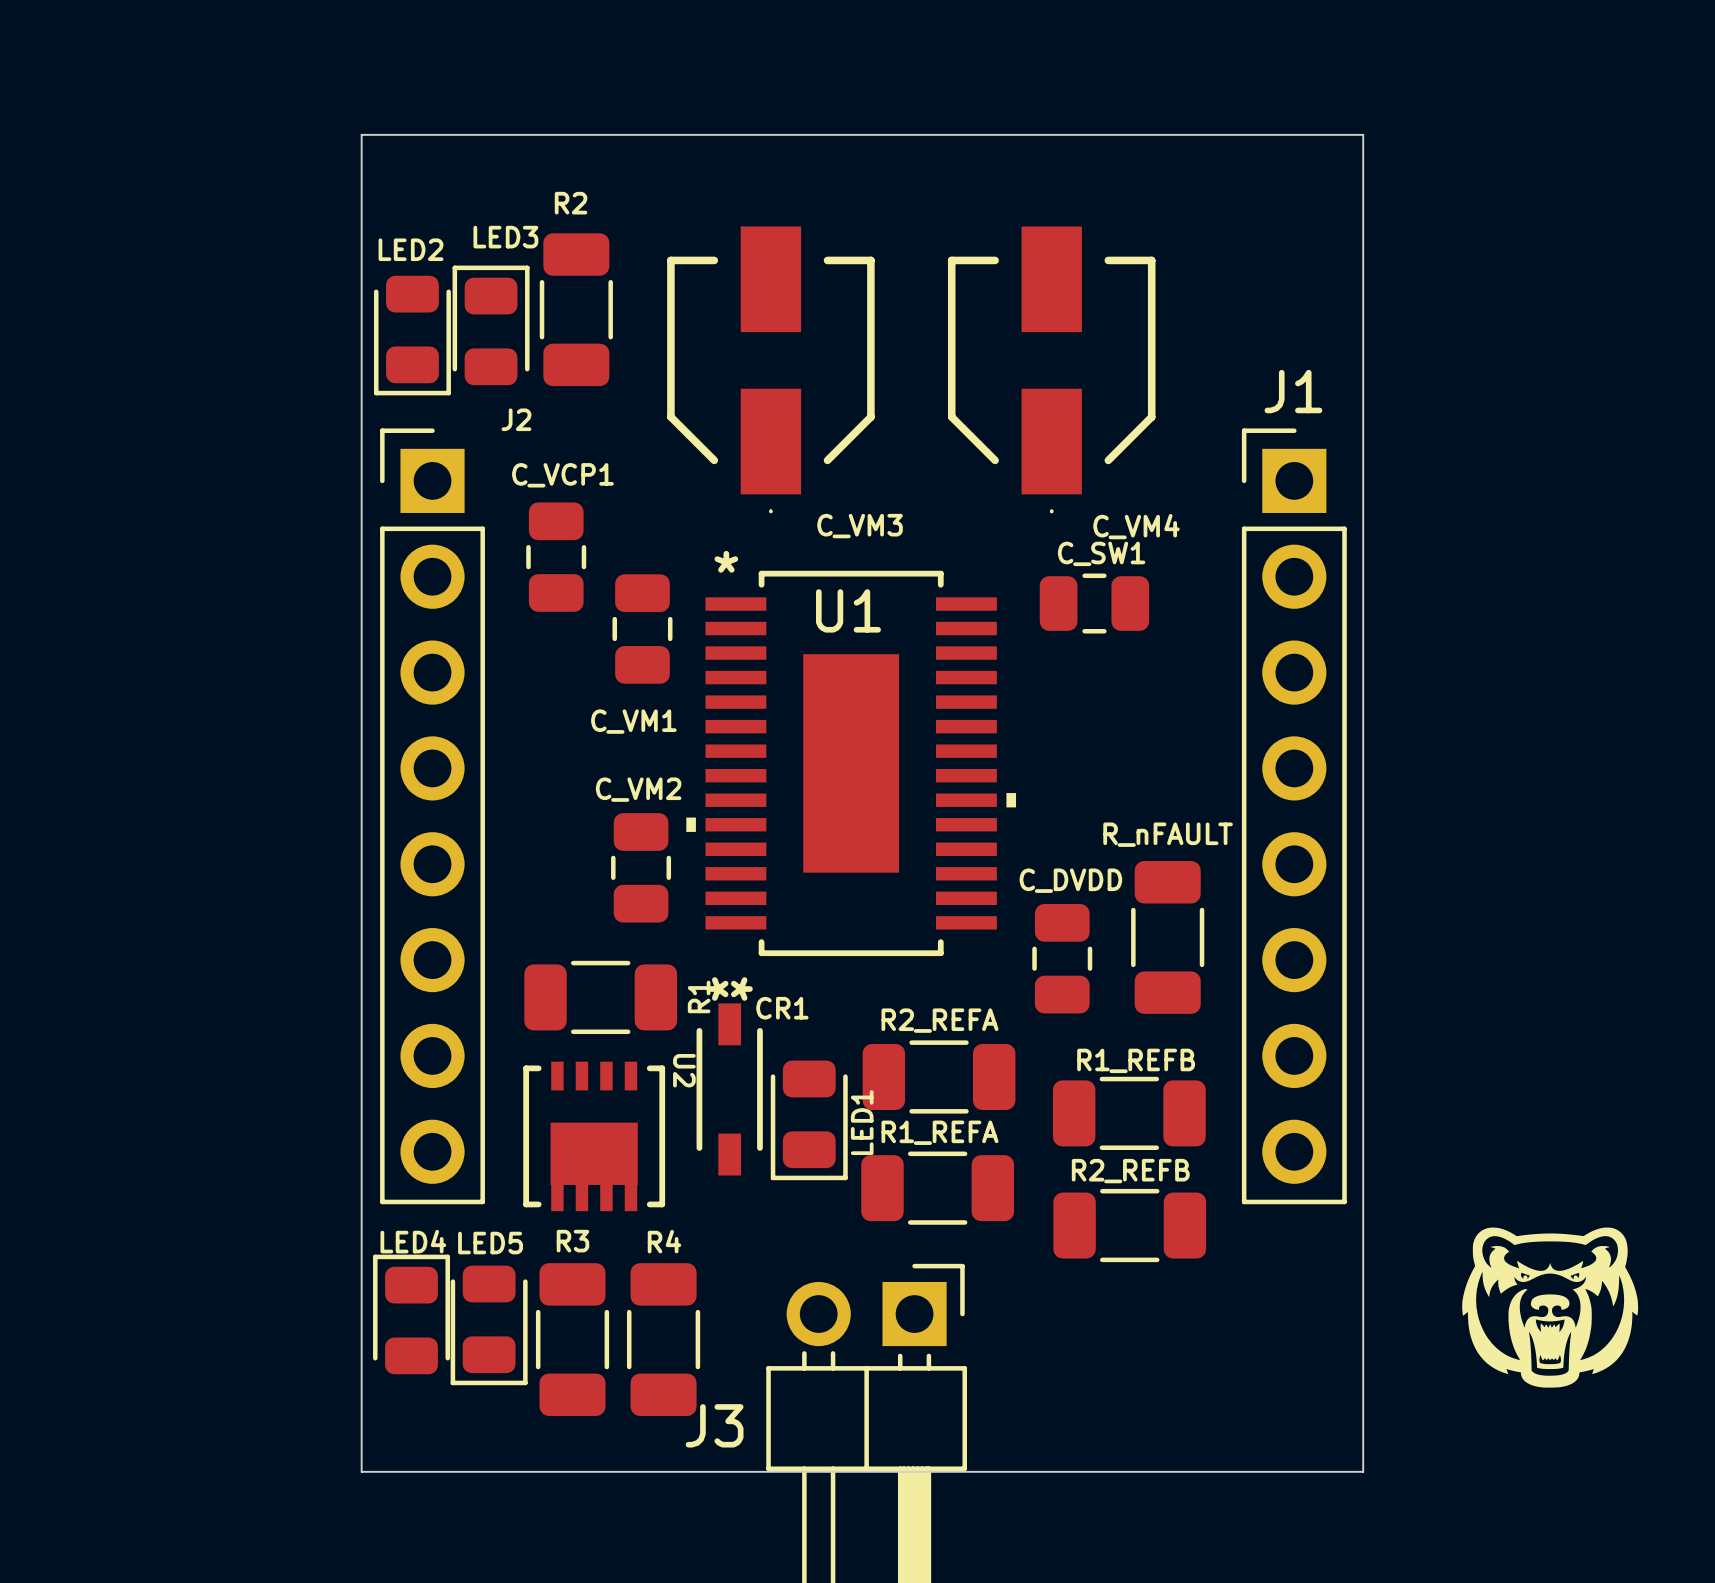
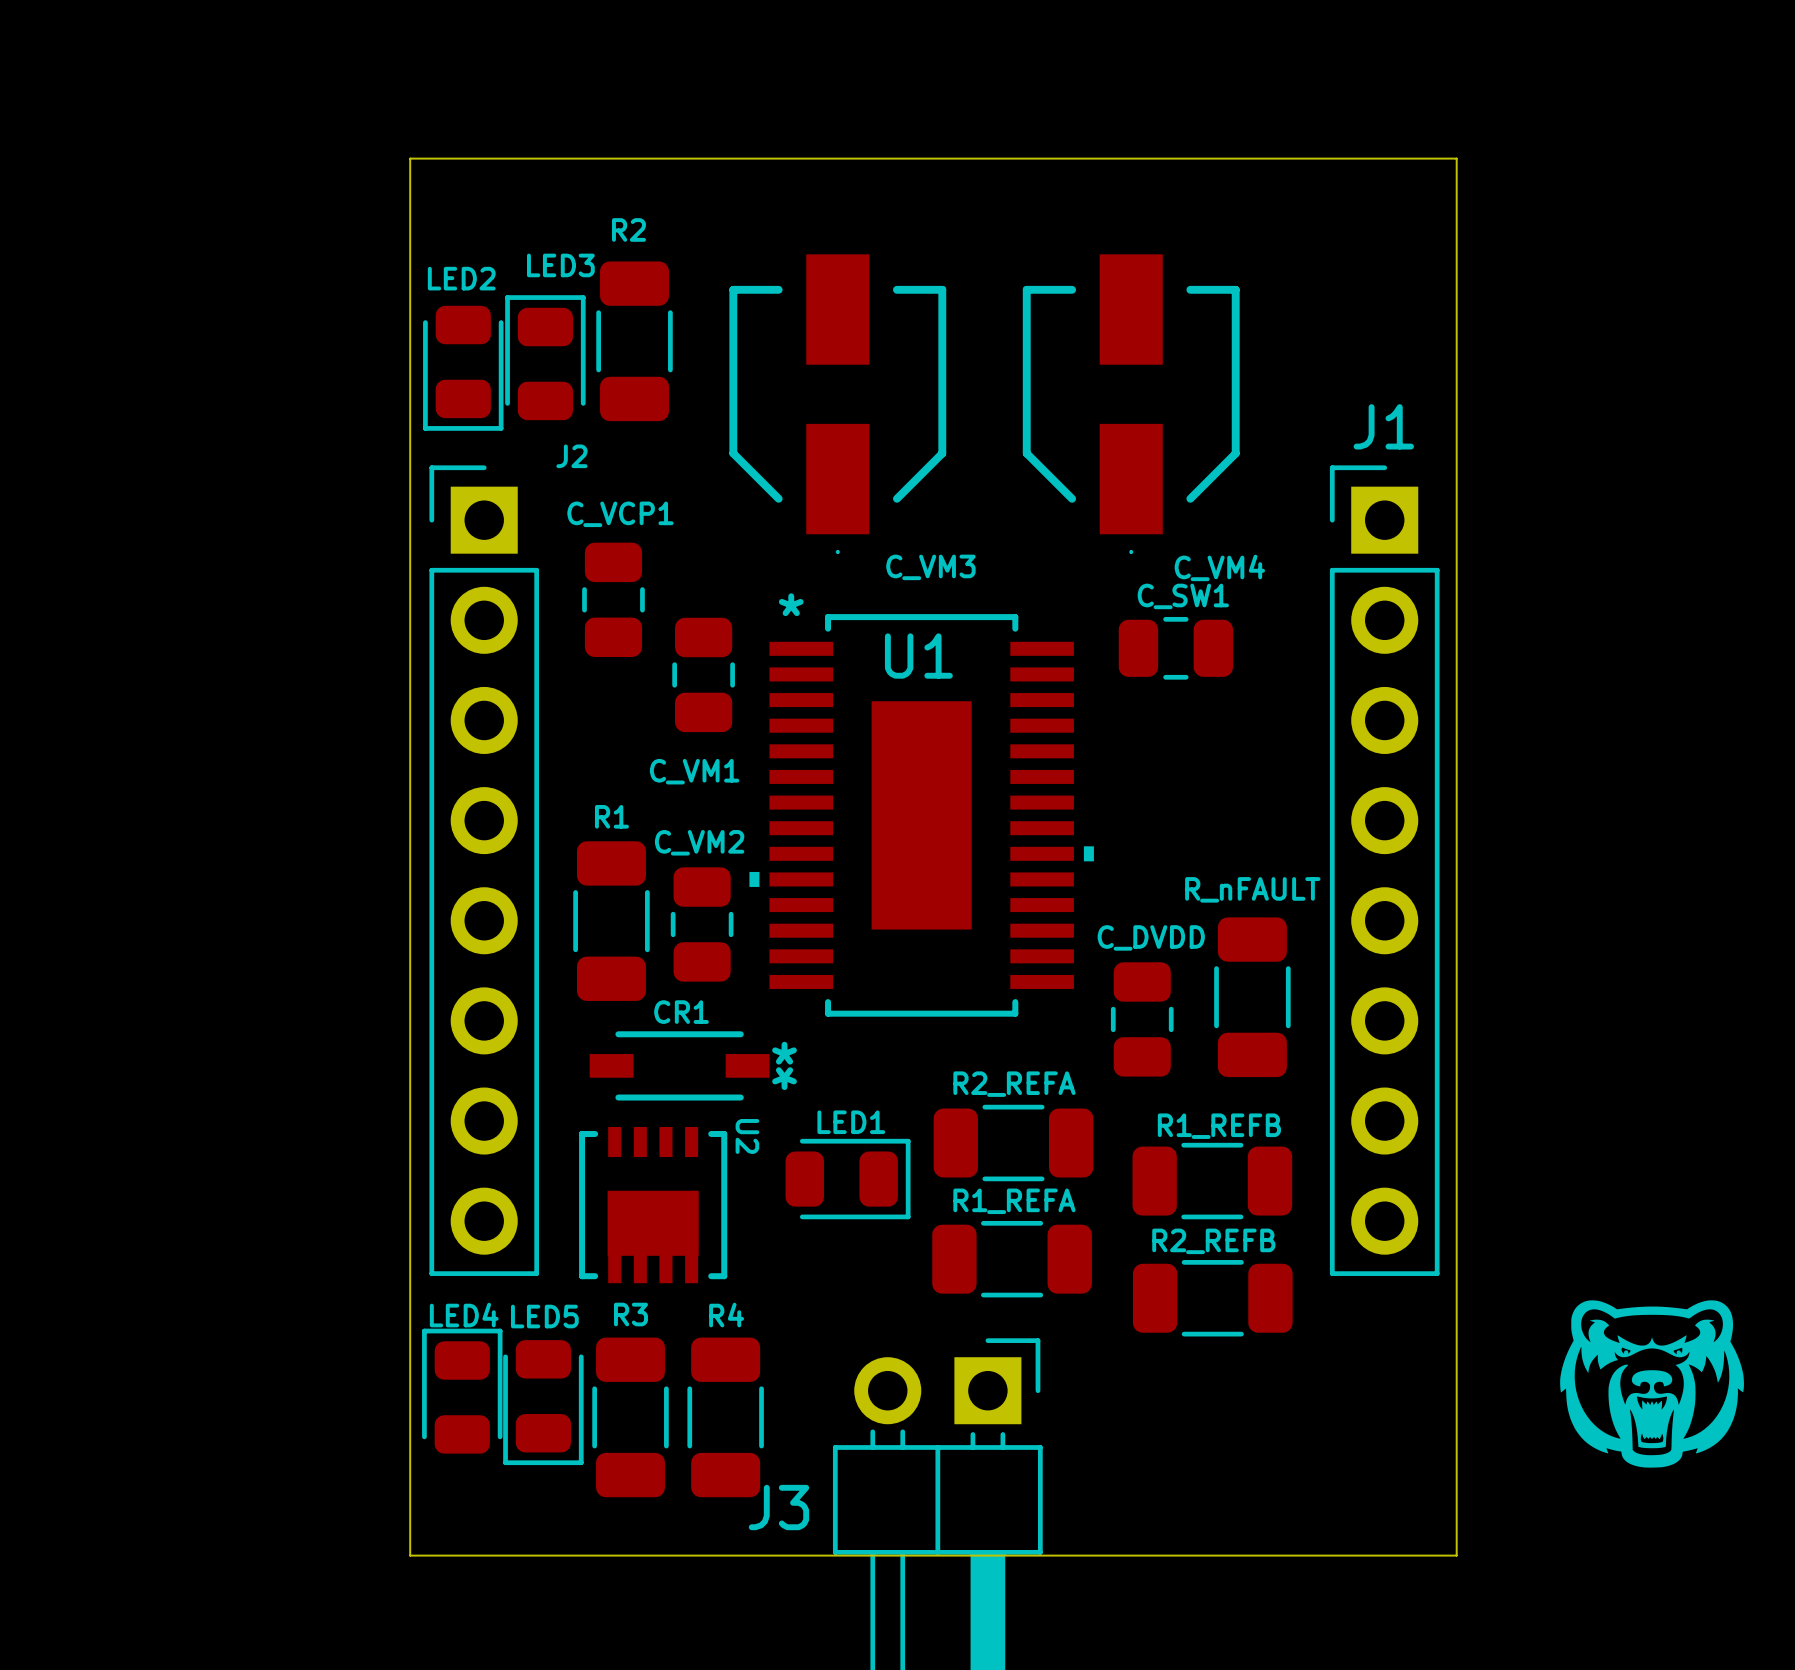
R1 name position: R1 (699, 996) -> R1 (611, 816)
R1 rotation: 0° (600, 997) -> 90° clockwise (611, 921)
R1 position: (600, 997) -> (611, 921)
CR1 rotation: 0° (729, 1089) -> 90° clockwise (679, 1065)
CR1 position: (729, 1089) -> (679, 1065)
LED1 rotation: 0° (809, 1120) -> 90° counterclockwise (848, 1179)

